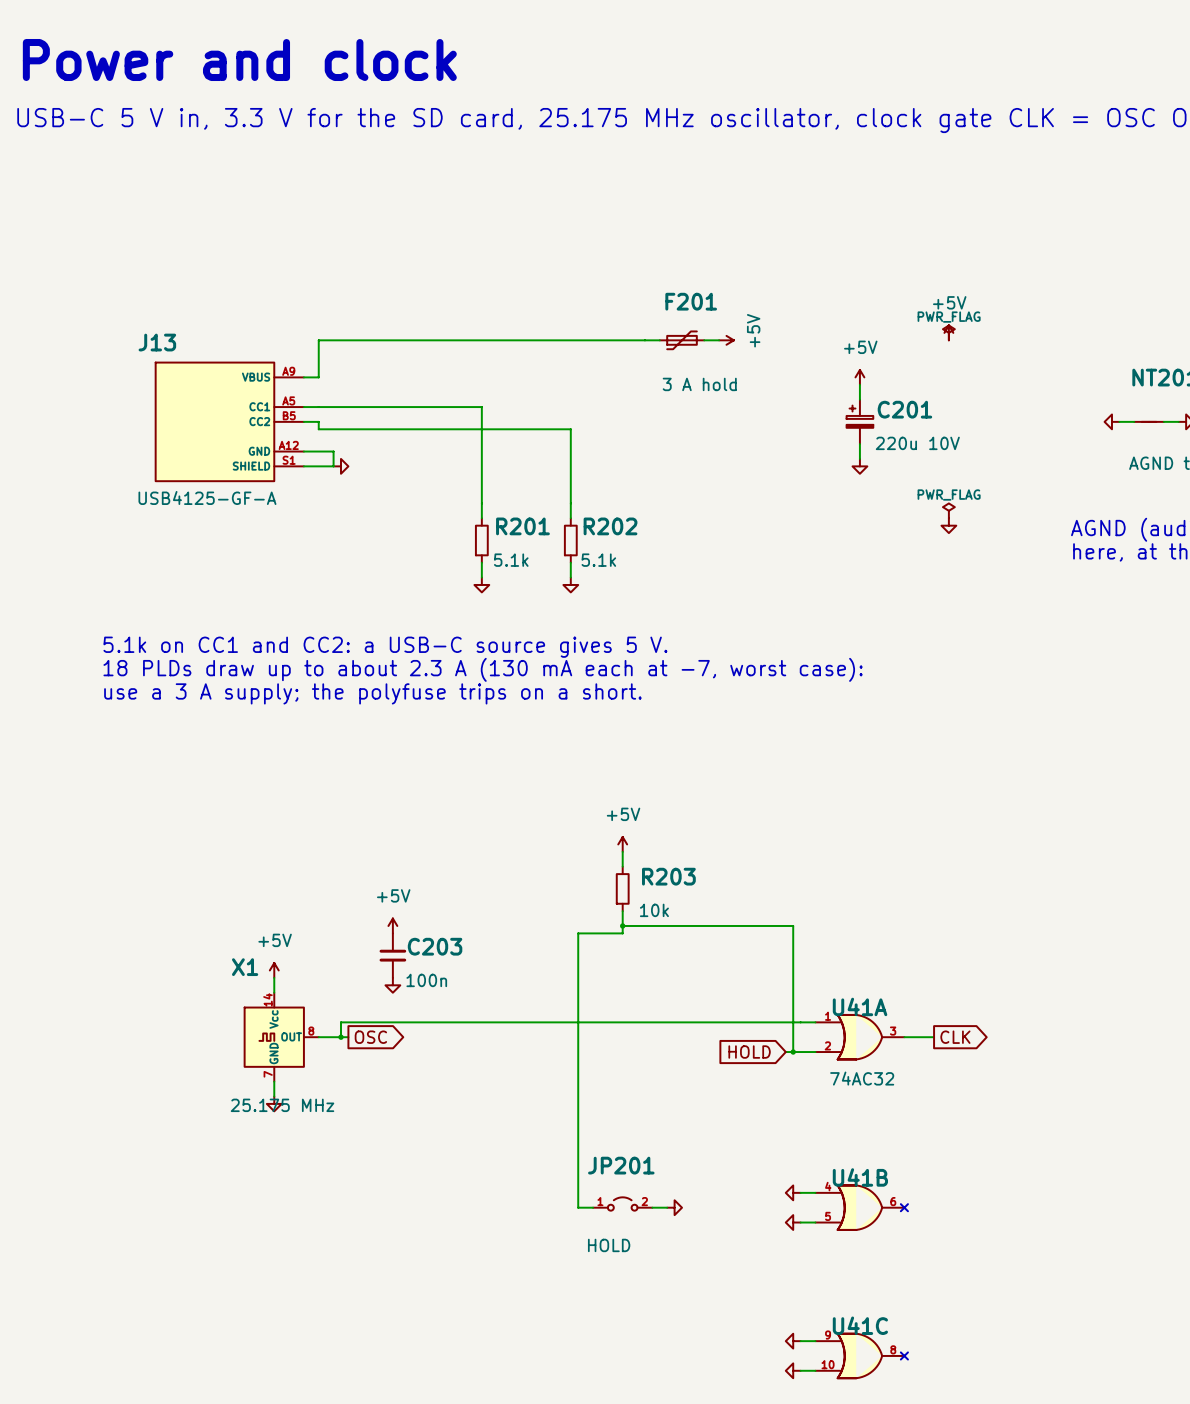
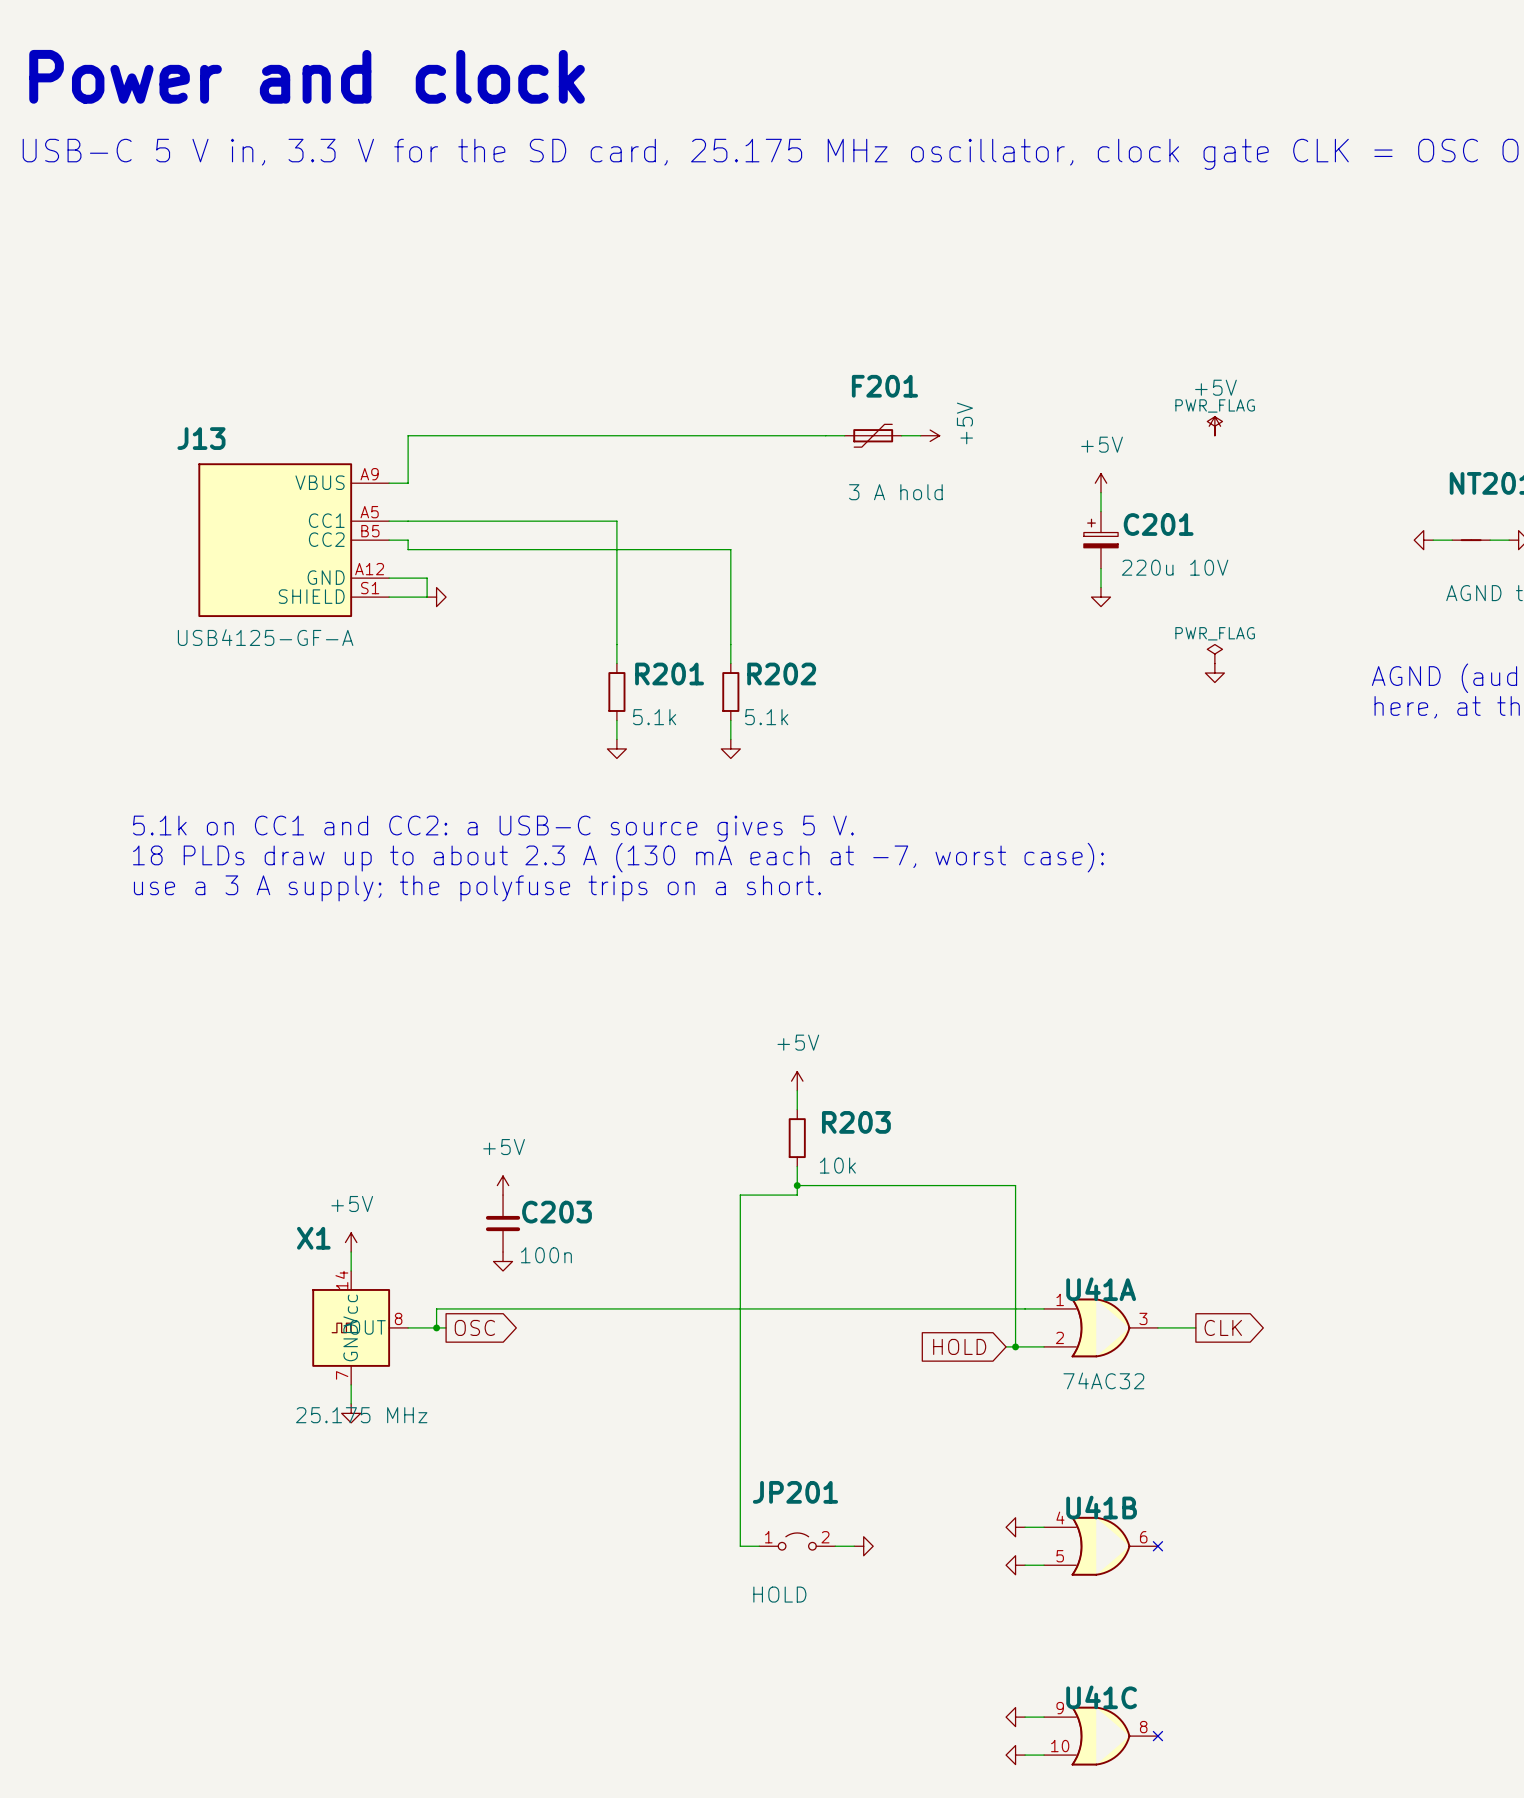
J13 symbol: [154, 361, 304, 482] -> [198, 463, 390, 618]
X1 symbol: [243, 992, 319, 1082] -> [312, 1270, 409, 1385]
U41A symbol: [815, 1014, 905, 1061] -> [1044, 1298, 1158, 1358]
U41B symbol: [815, 1184, 905, 1231] -> [1044, 1516, 1158, 1576]
JP201 symbol: [593, 1197, 653, 1211] -> [759, 1532, 836, 1551]
U41C symbol: [815, 1332, 905, 1379] -> [1044, 1706, 1158, 1766]

